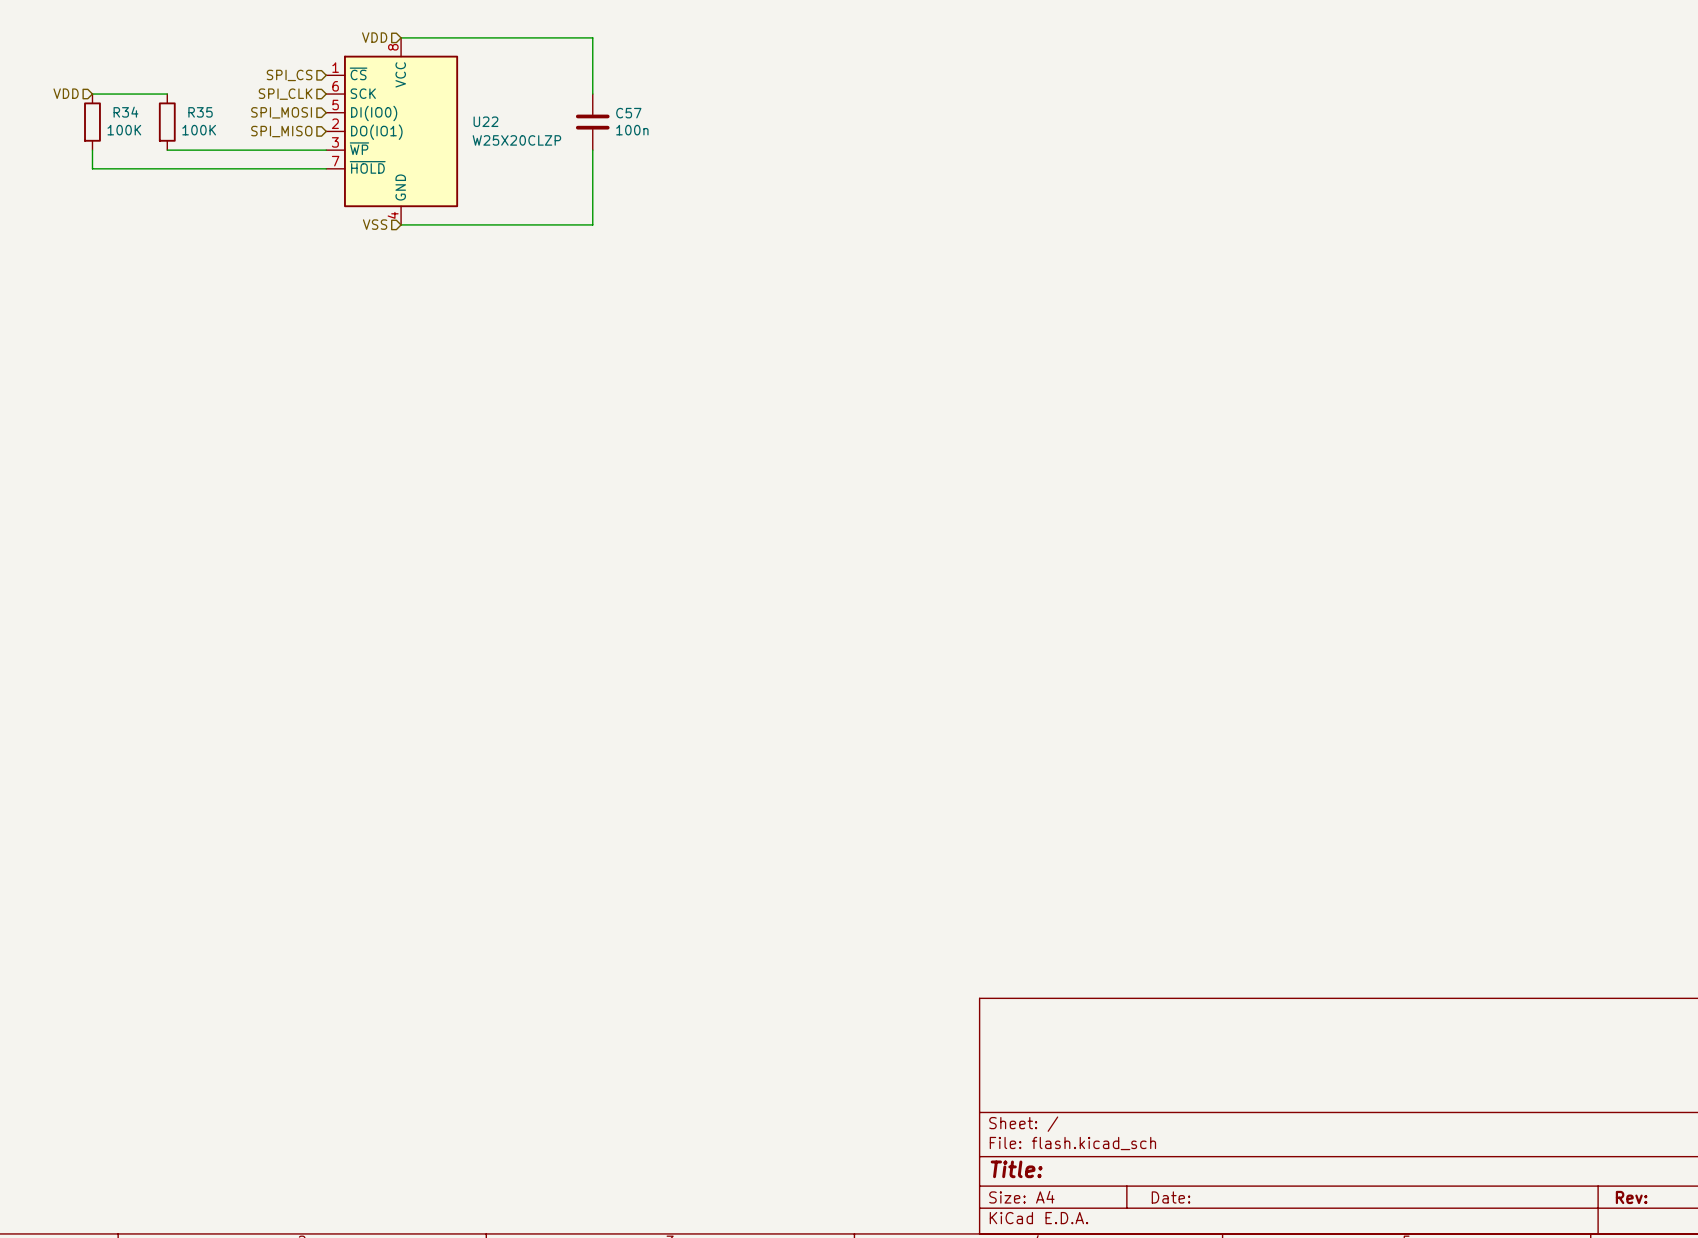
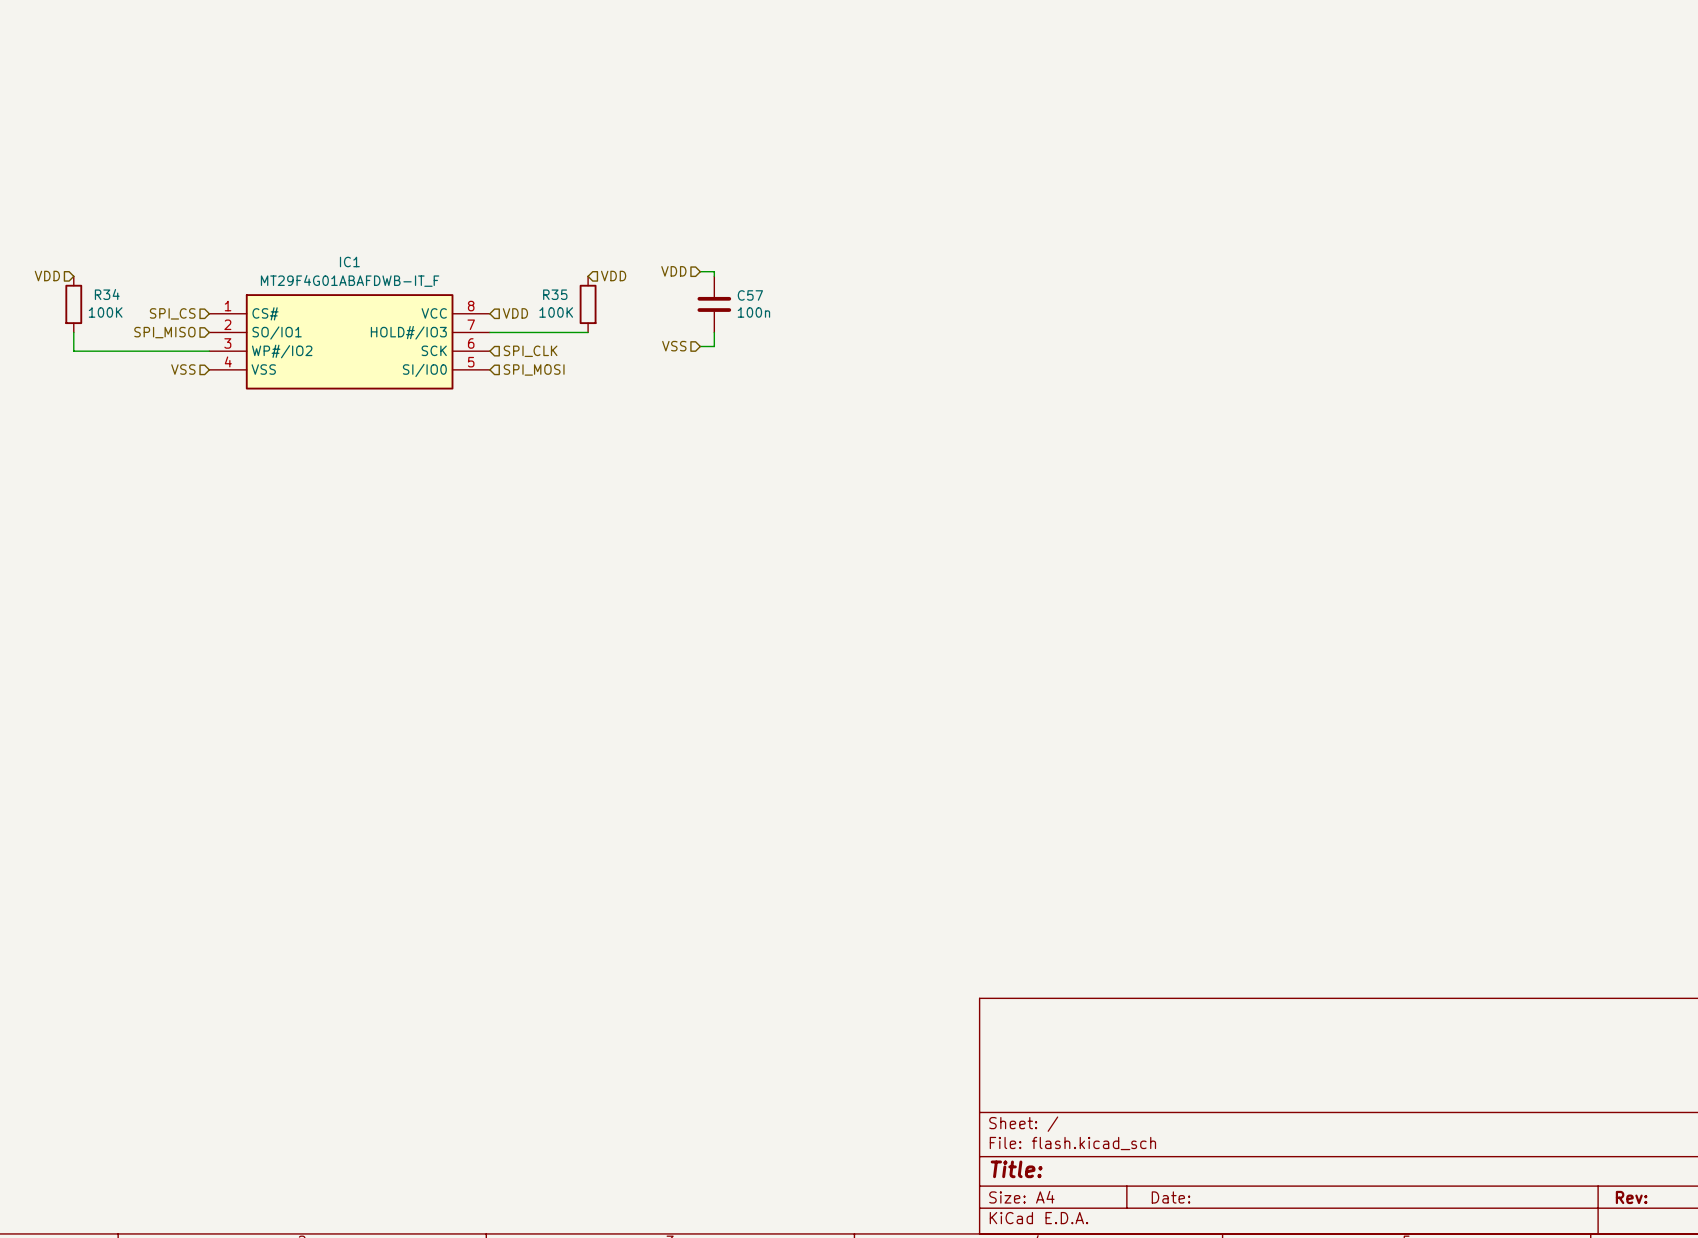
hierarchical label: VDD (374, 37) -> none
wire: (401, 37) (592, 37) (592, 94) -> none
hierarchical label: SPI_CS (289, 75) -> none
hierarchical label position: VDD (66, 93) -> VDD (47, 276)
wire: (92, 94) (167, 94) -> none
hierarchical label: SPI_CLK (285, 94) -> none
R35 name position: R35 (200, 112) -> R35 (555, 294)
hierarchical label: SPI_MOSI (281, 112) -> none
R34 position: (92, 122) -> (73, 304)
R35 position: (167, 122) -> (588, 304)
C57 position: (592, 122) -> (714, 304)
R35 value position: 100K (199, 130) -> 100K (556, 312)
hierarchical label: SPI_MISO (281, 131) -> none
U22: W25X20CLZP (392, 131) -> none
wire: (92, 150) (92, 168) (326, 168) -> none
wire: (167, 150) (326, 150) -> none
wire: (592, 150) (592, 224) (401, 224) -> none
hierarchical label: VSS (375, 224) -> none
hierarchical label: none -> VDD (673, 271)
wire: none -> (700, 271) (714, 271) (714, 276)
hierarchical label: none -> VDD (613, 276)
hierarchical label: none -> SPI_CS (172, 313)
hierarchical label: none -> VDD (515, 313)
wire: none -> (73, 332) (73, 351) (209, 351)
hierarchical label: none -> SPI_MISO (164, 332)
wire: none -> (489, 332) (588, 332)
wire: none -> (714, 332) (714, 346) (700, 346)
IC1: none -> MT29F4G01ABAFDWB-IT_F (349, 341)
hierarchical label: none -> VSS (674, 346)
hierarchical label: none -> SPI_CLK (530, 351)
hierarchical label: none -> VSS (183, 369)
hierarchical label: none -> SPI_MOSI (534, 369)

